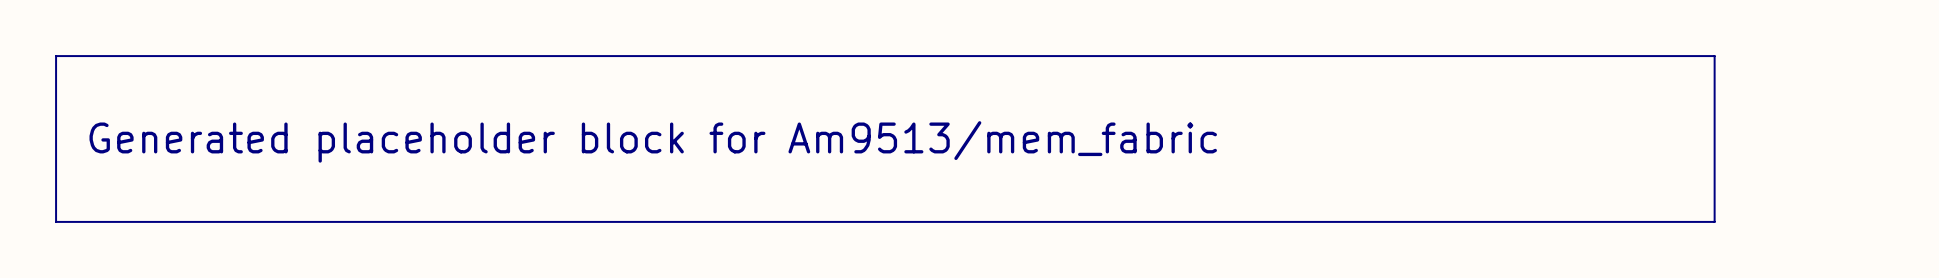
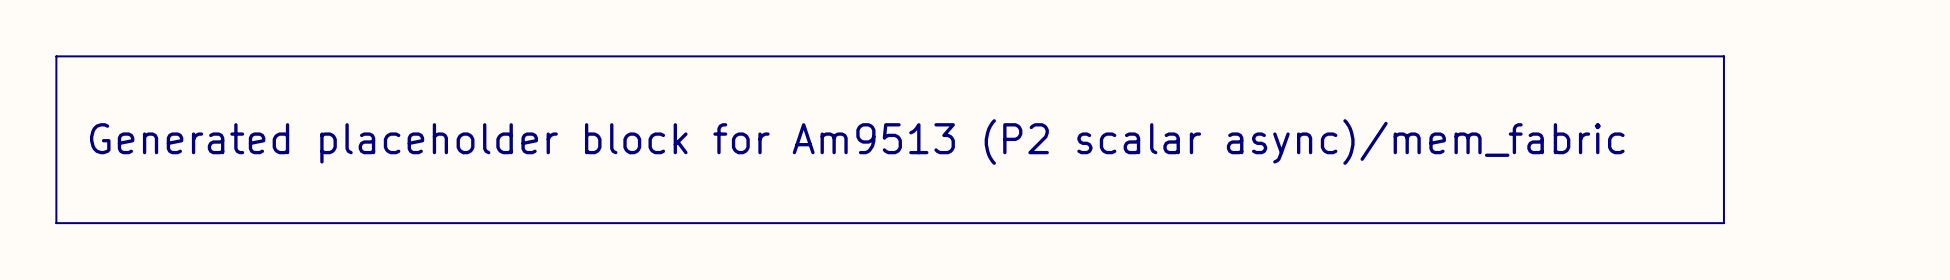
text: Generated placeholder block for Am9513/mem_fabric (653, 141) -> Generated placeholder block for Am9513 (P2 scalar async)/mem_fabric (857, 142)

